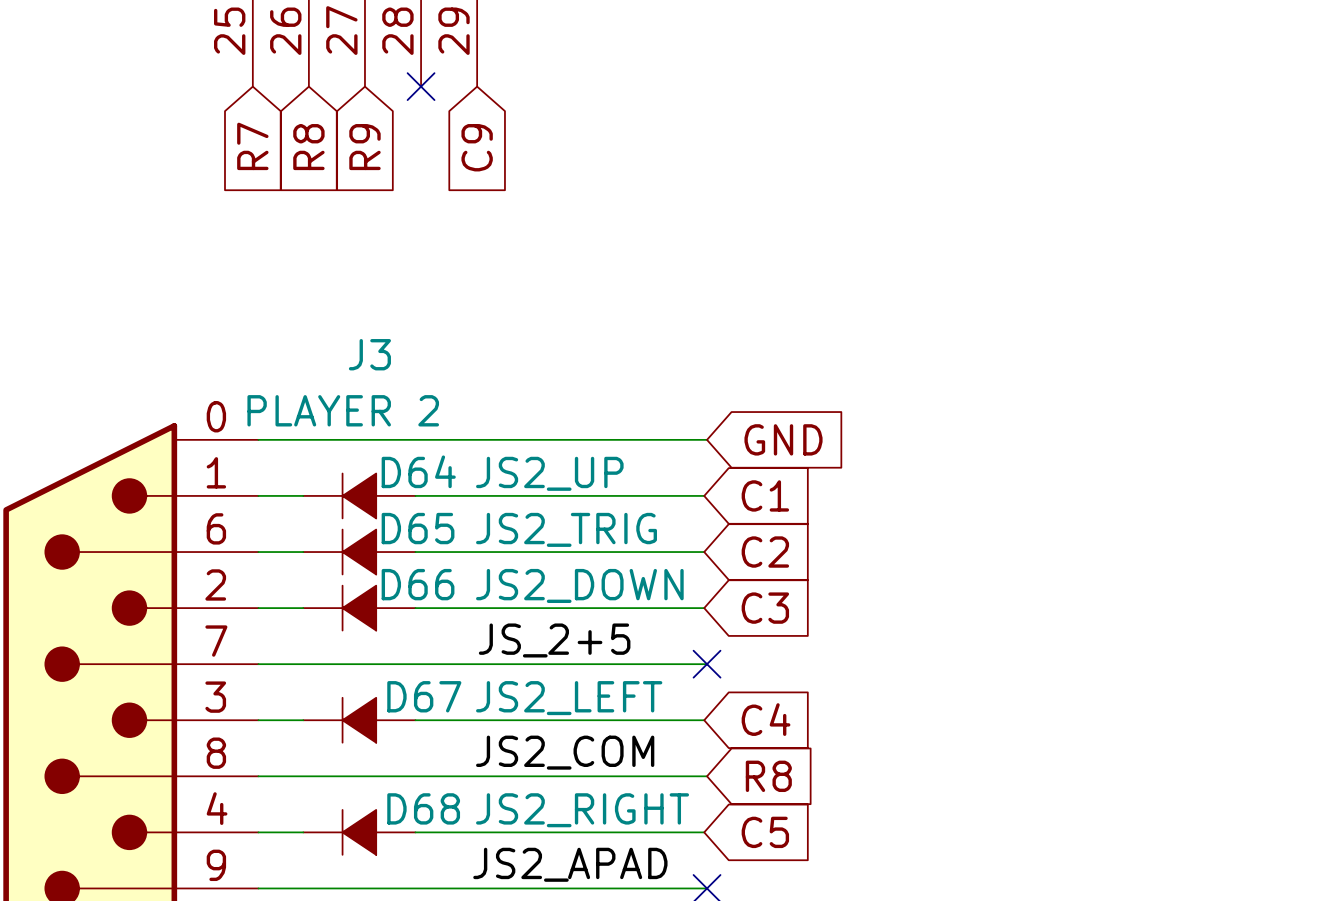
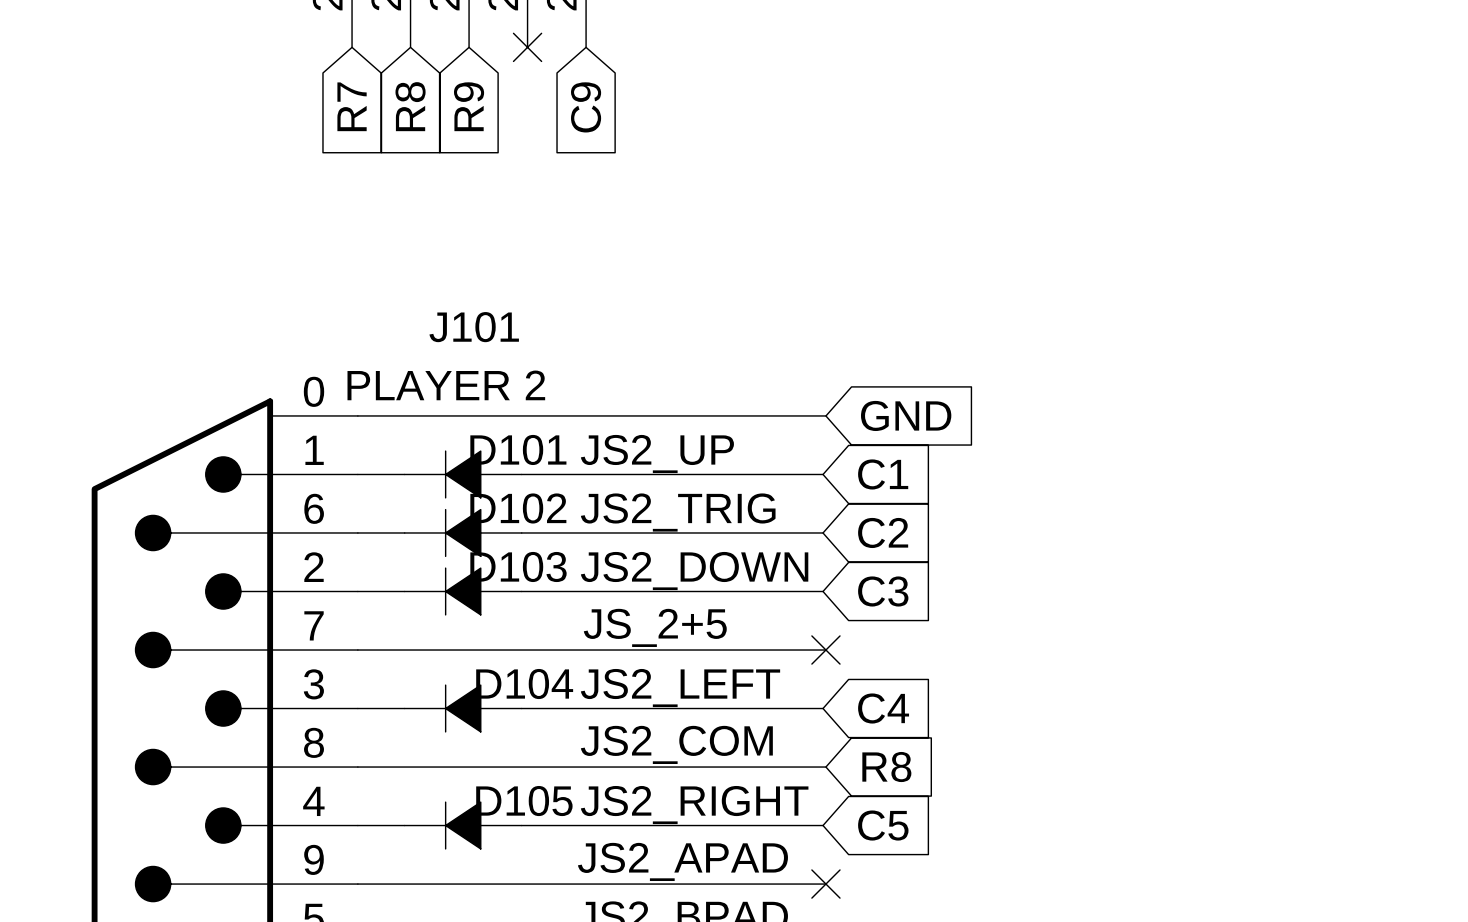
J3 name: J3 (369, 354) -> J101 (474, 327)
D64 name: D64 (418, 471) -> D101 (518, 449)
D65 name: D65 (418, 528) -> D102 (518, 508)
D66 name: D66 (418, 584) -> D103 (518, 566)
D67 name: D67 (424, 696) -> D104 (524, 684)
D68 name: D68 (423, 808) -> D105 (524, 801)

